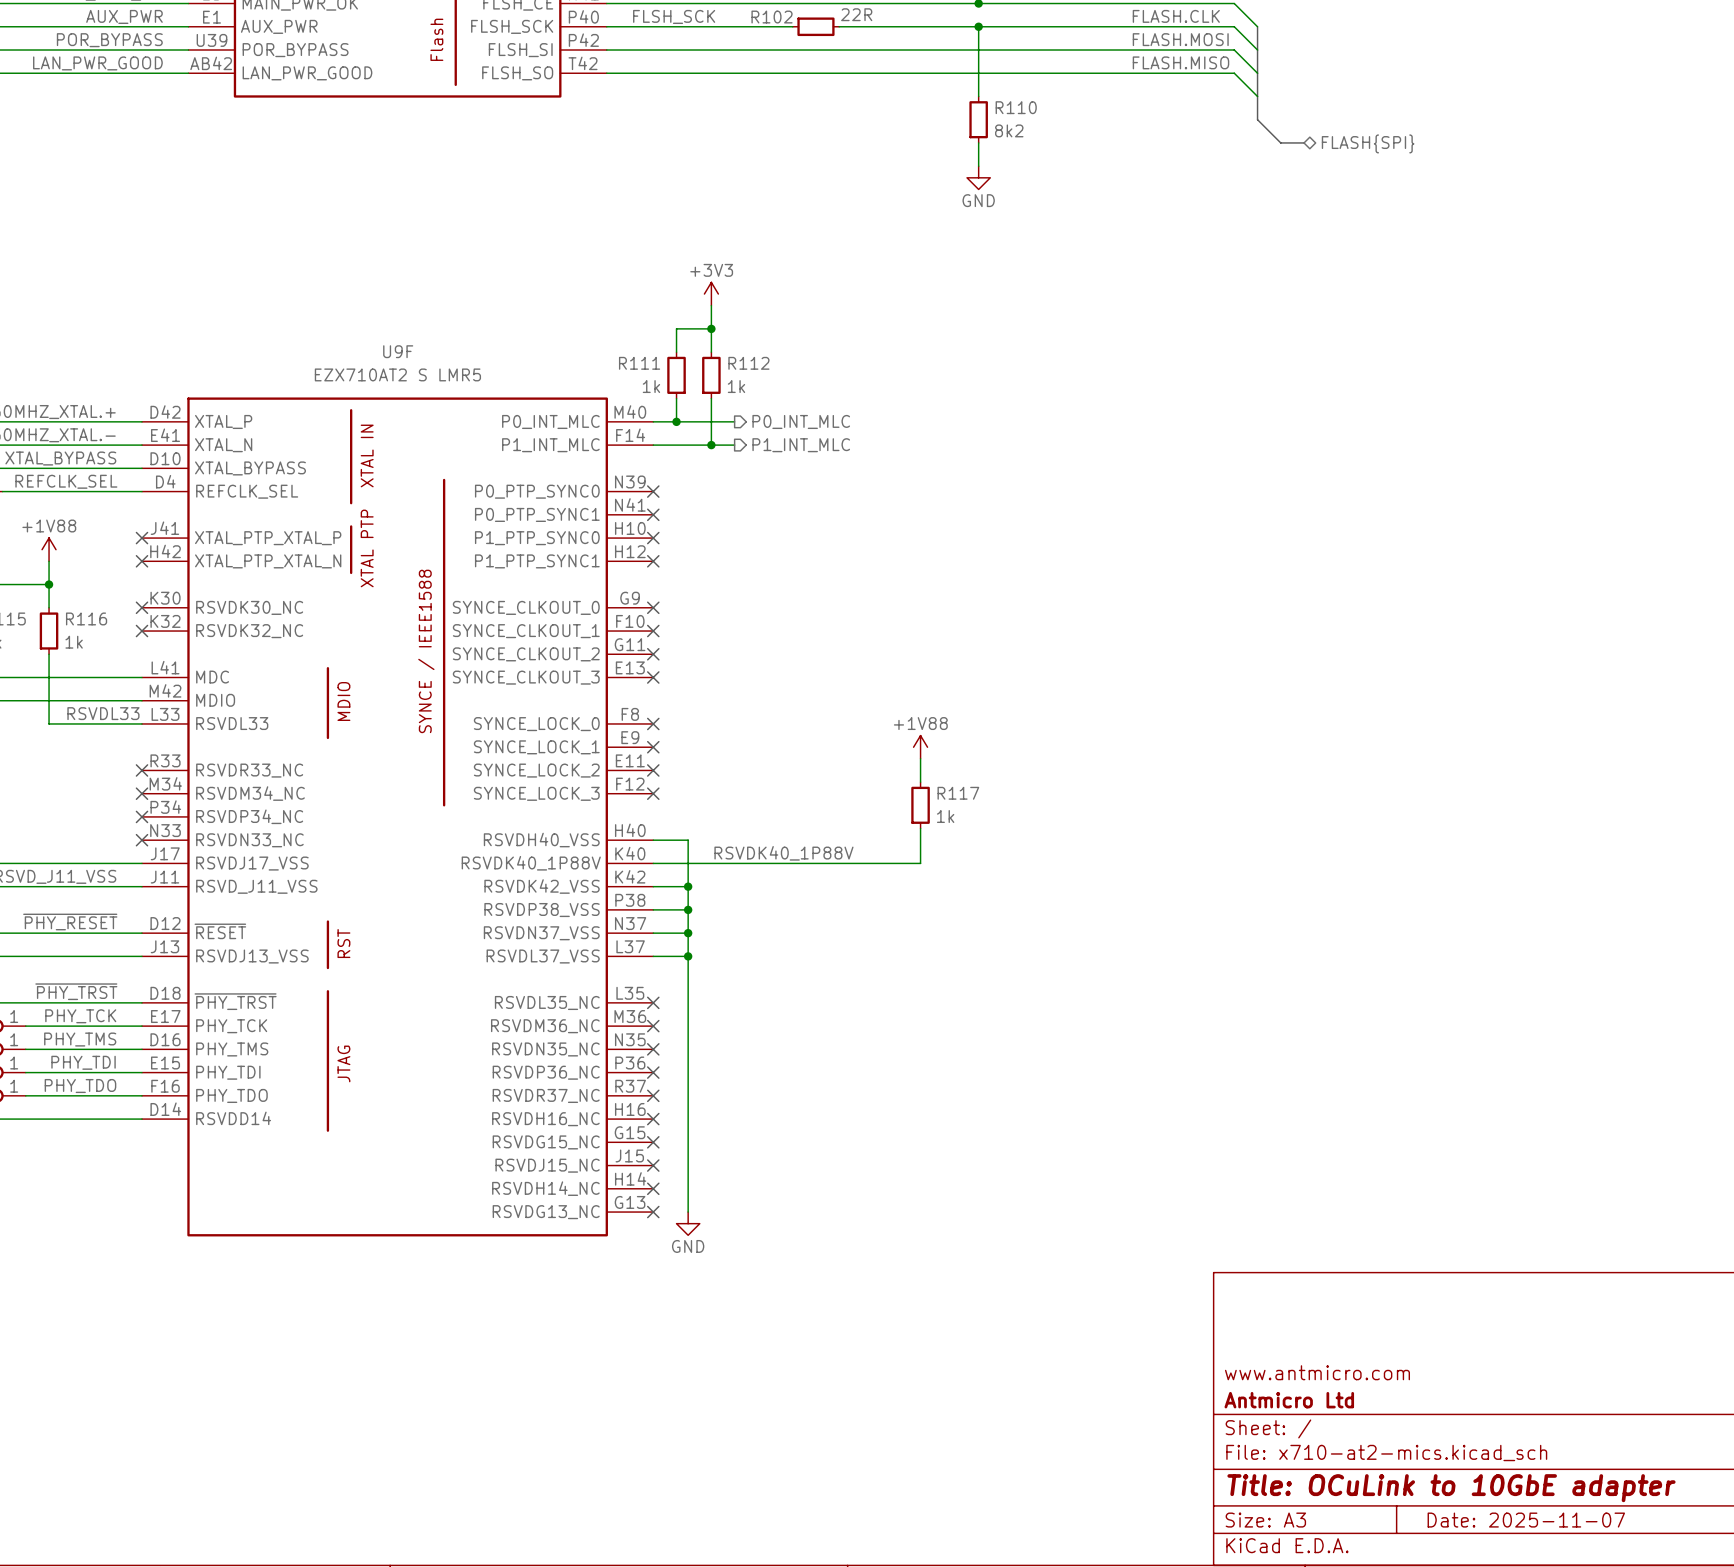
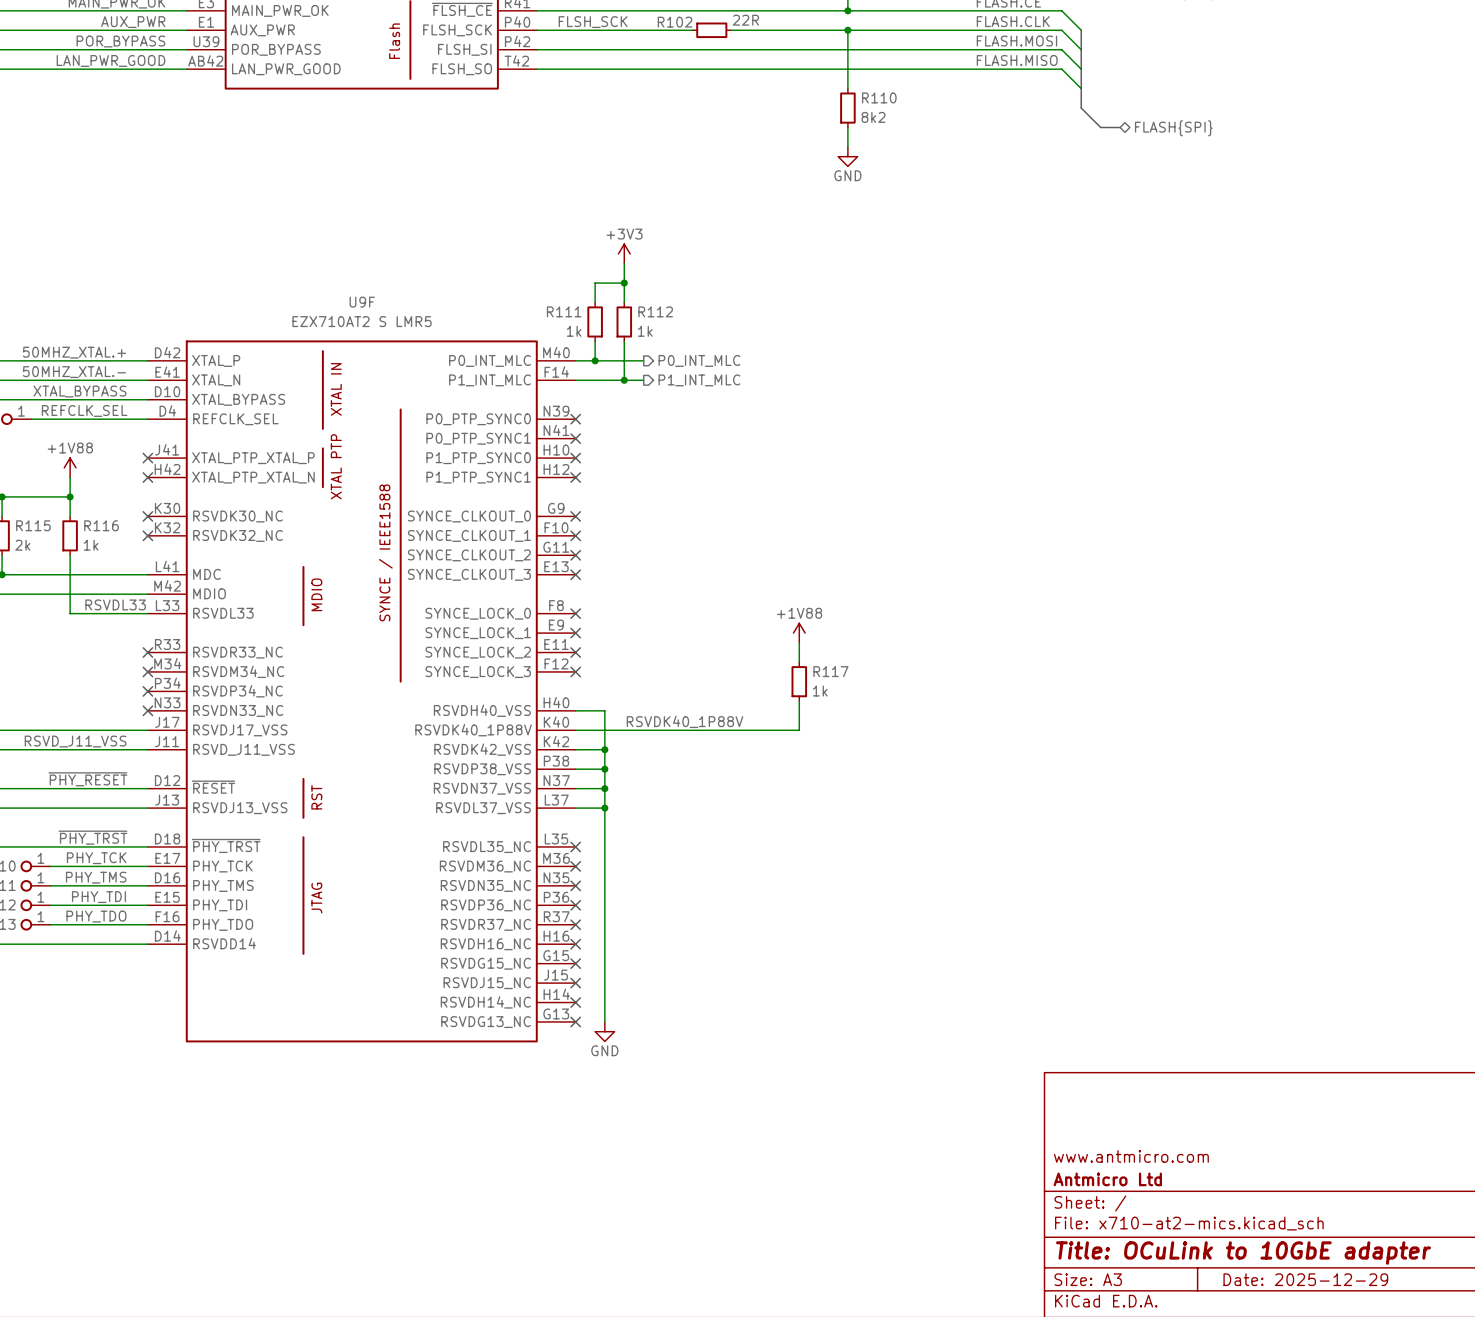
title block: Date: 2025-11-07 (1526, 1520) -> Date: 2025-12-29 (1305, 1279)

